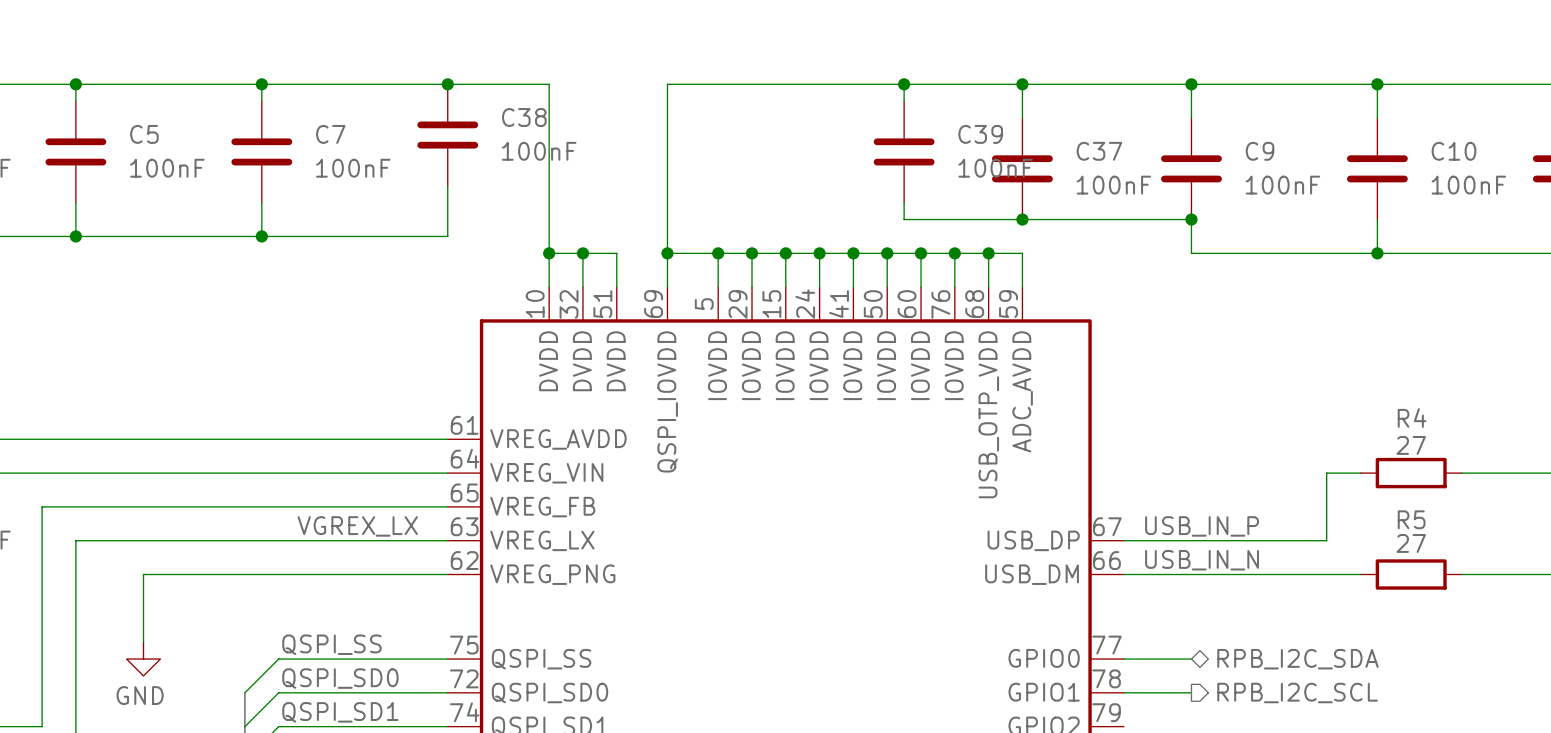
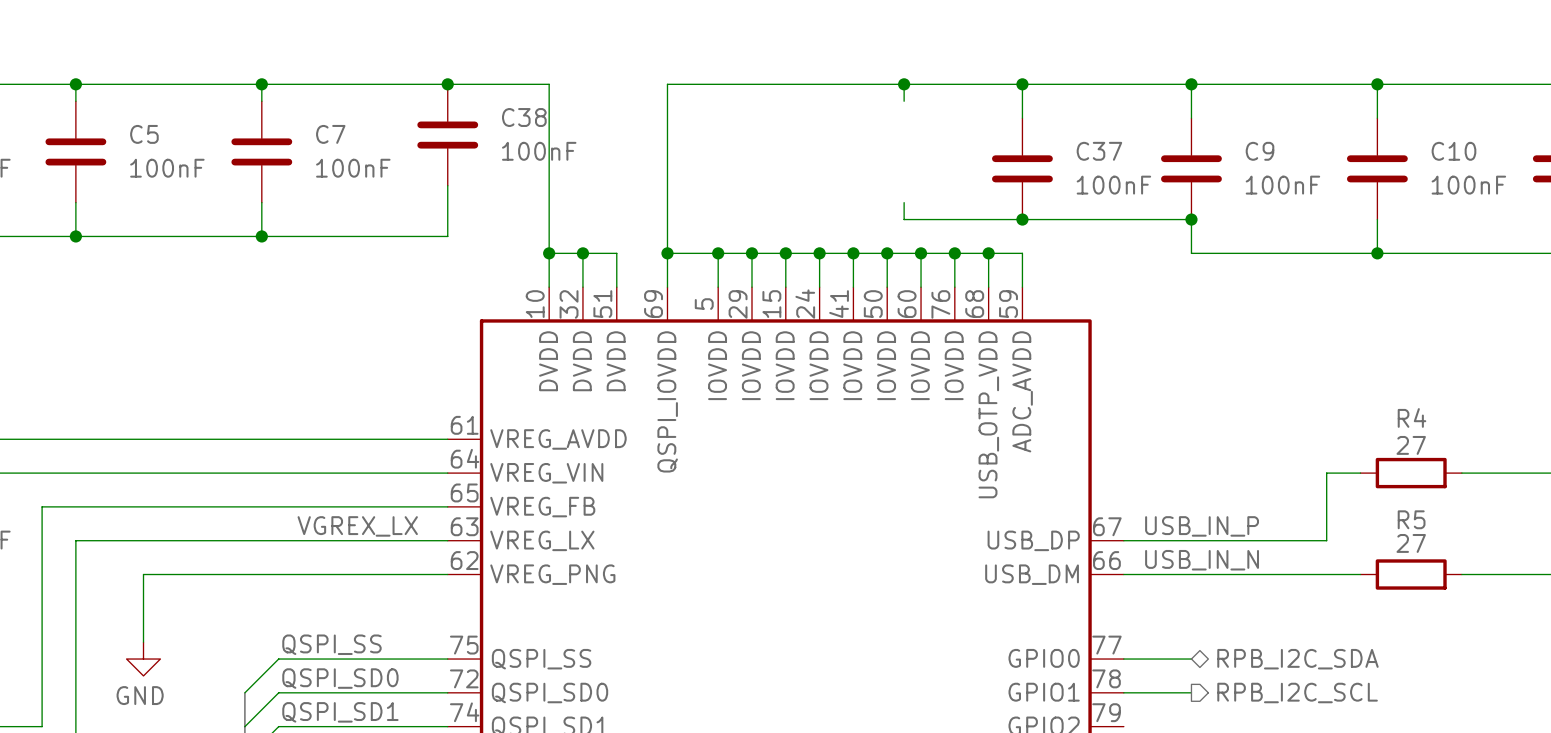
C39: 100nF (904, 151) -> none

